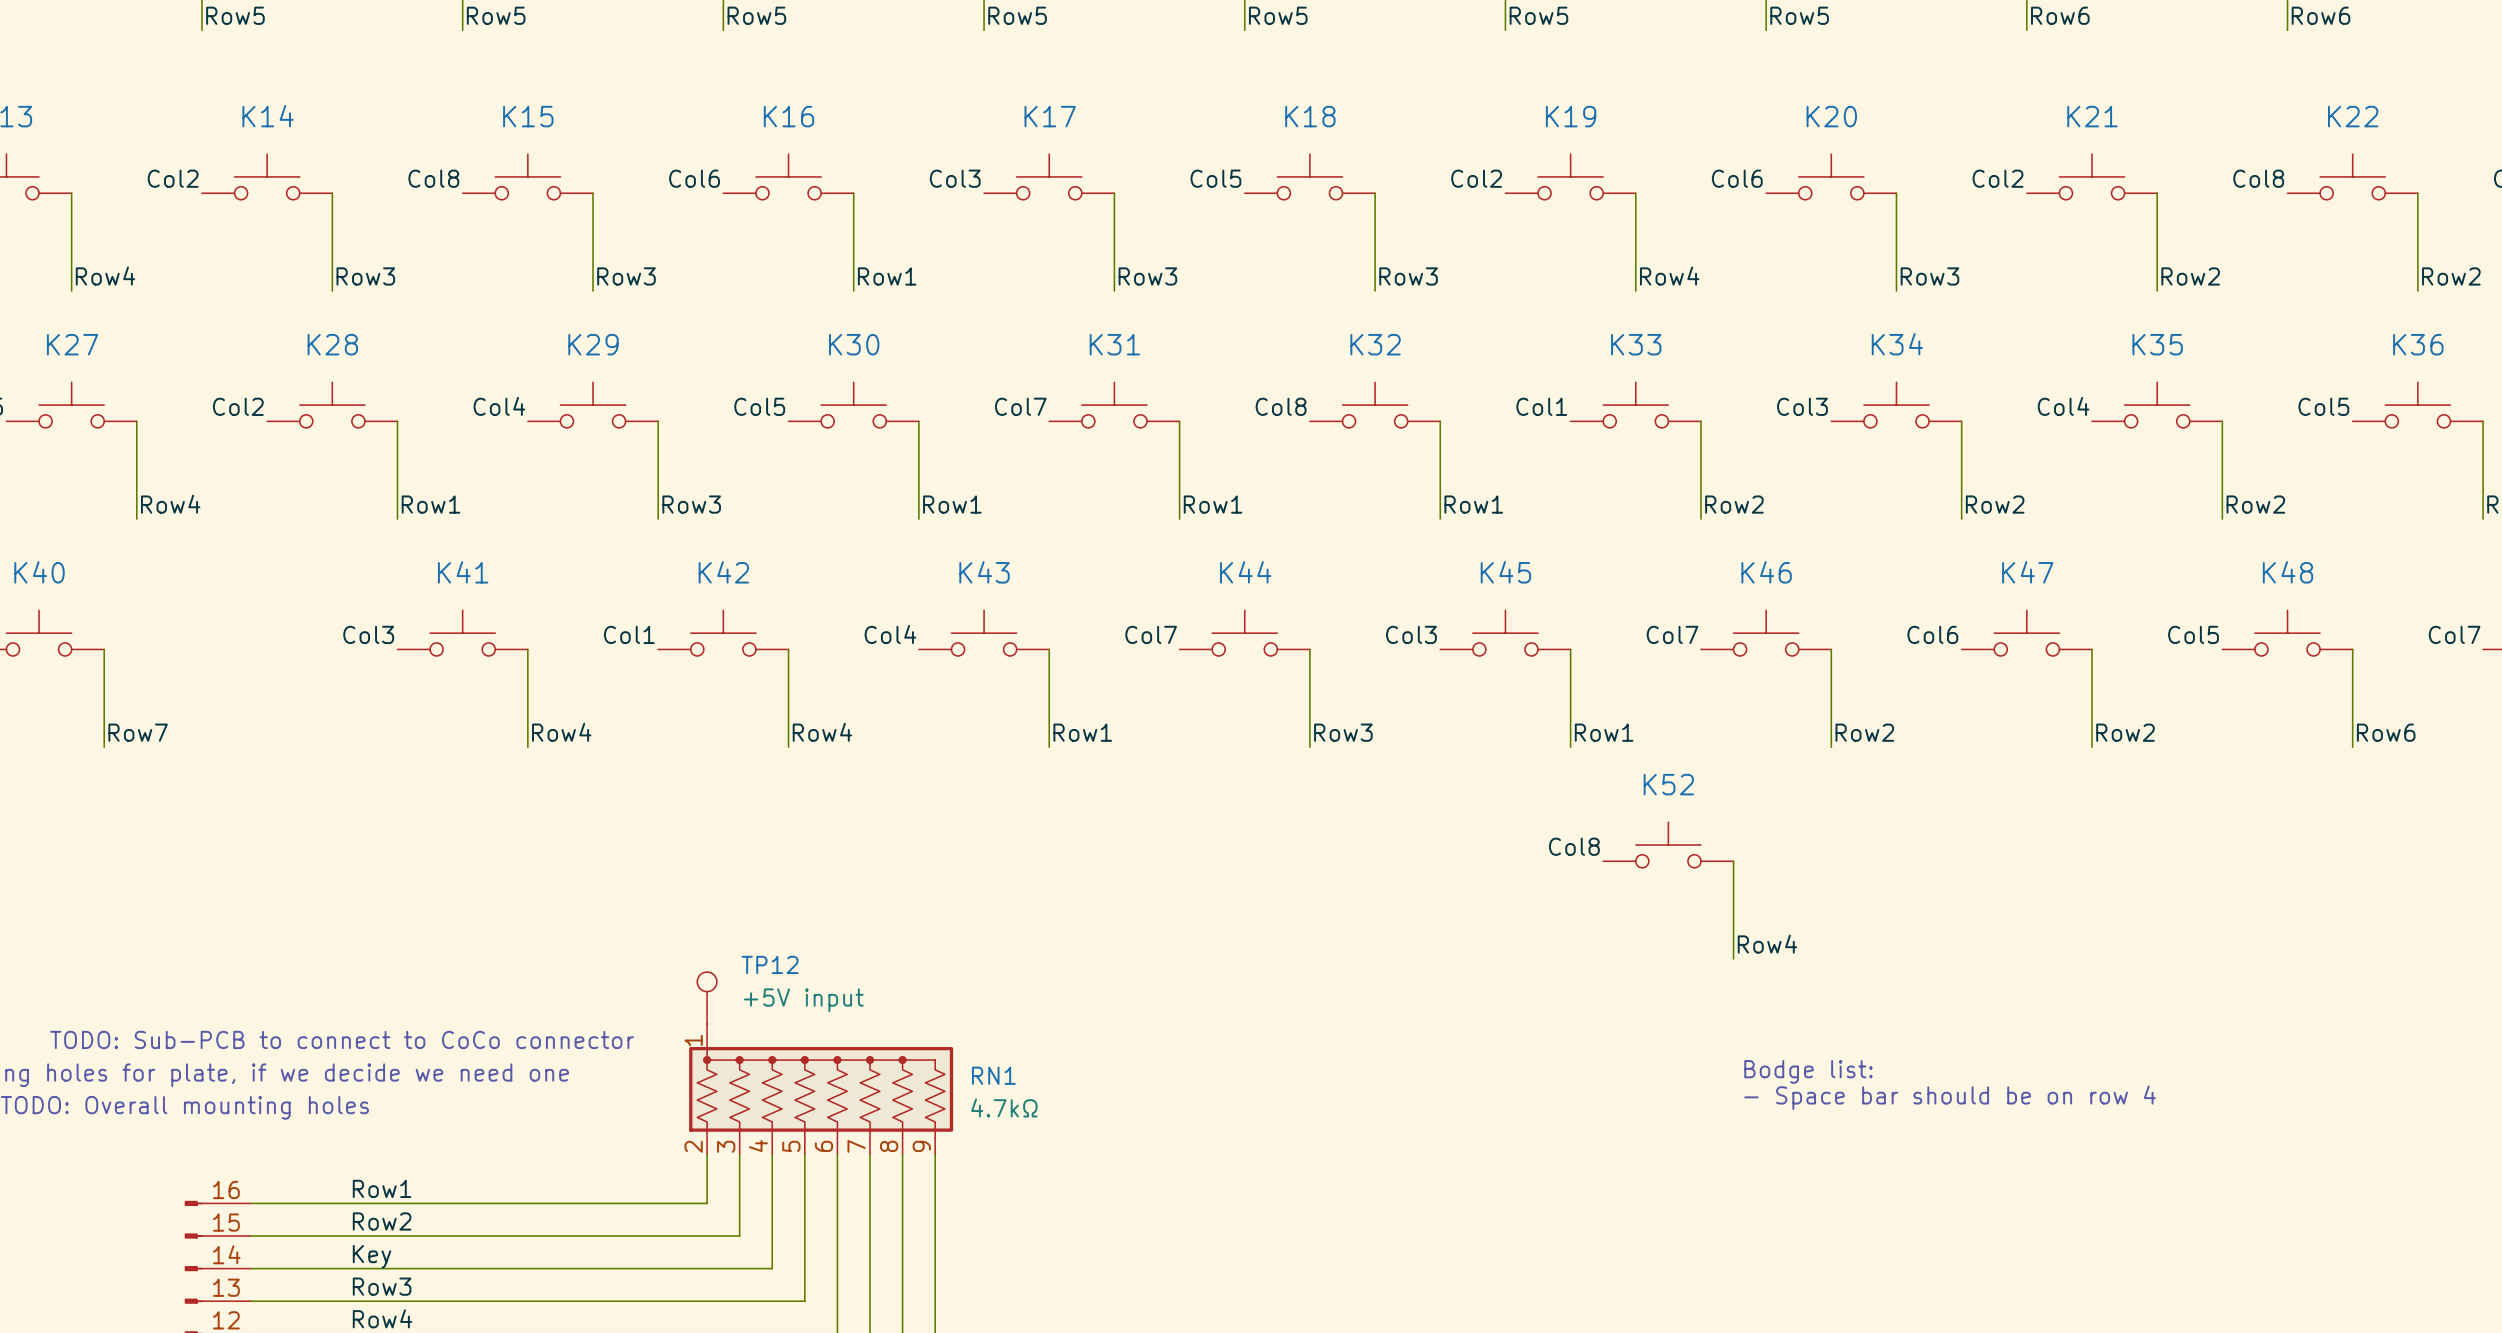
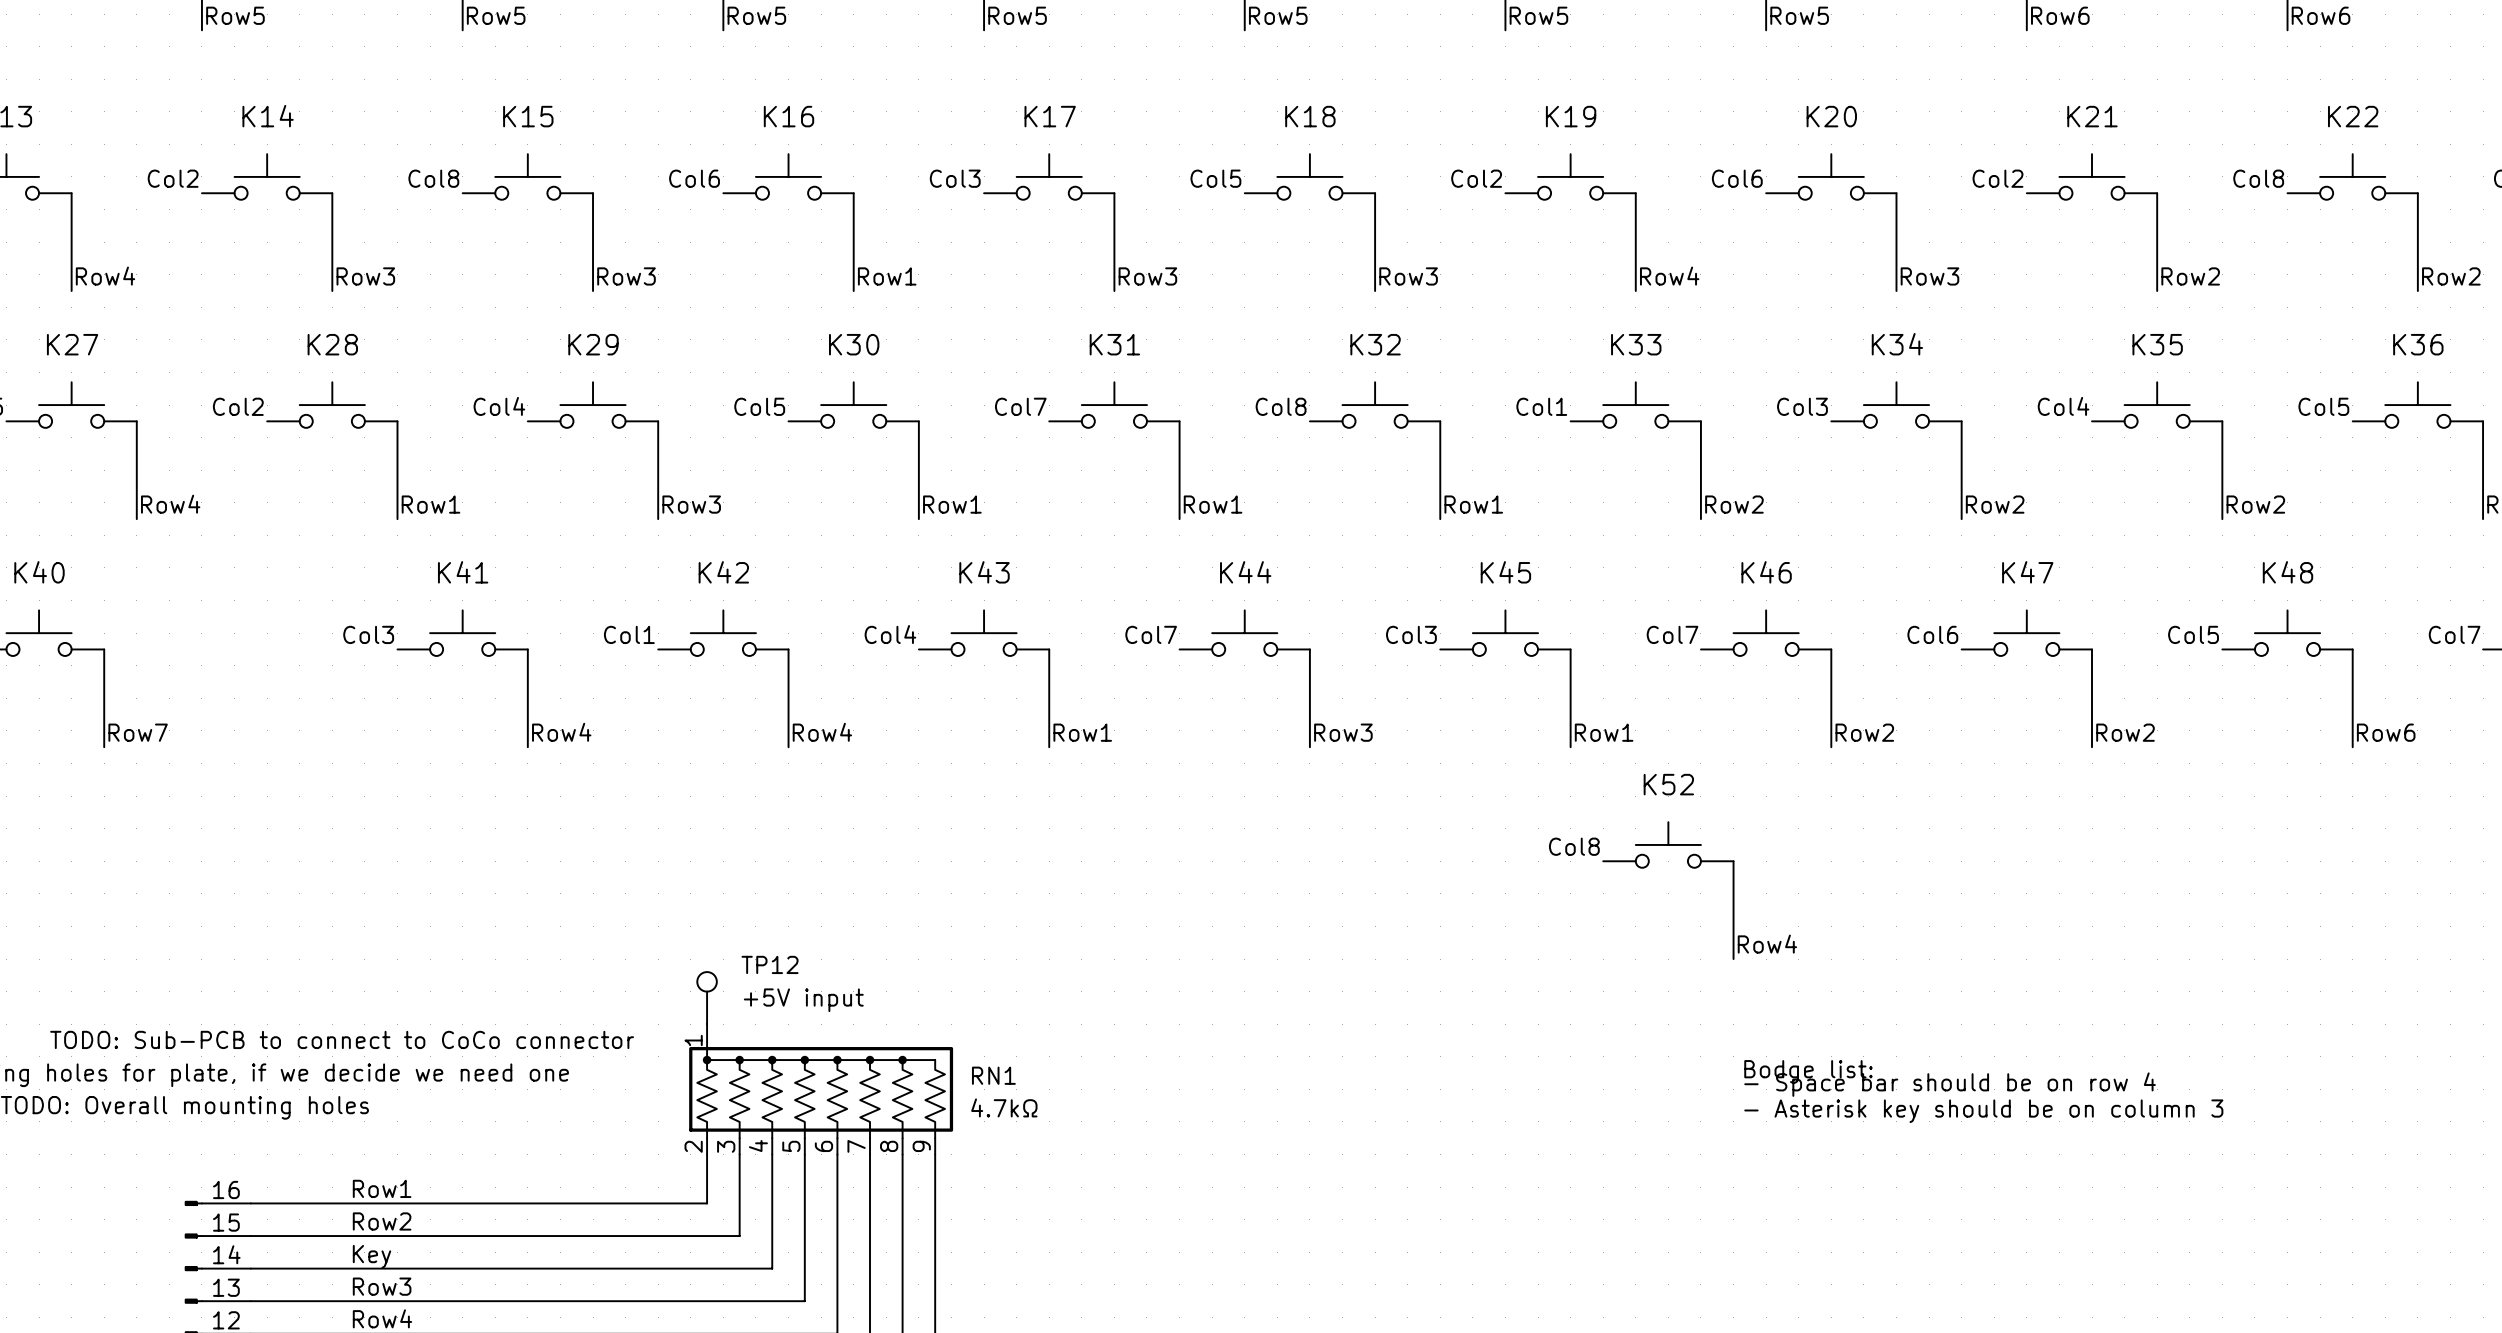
text position: - Space bar should be on row 4 (1950, 1097) -> - Space bar should be on row 4 (1950, 1084)
text: none -> - Asterisk key should be on column 3 (1983, 1111)

